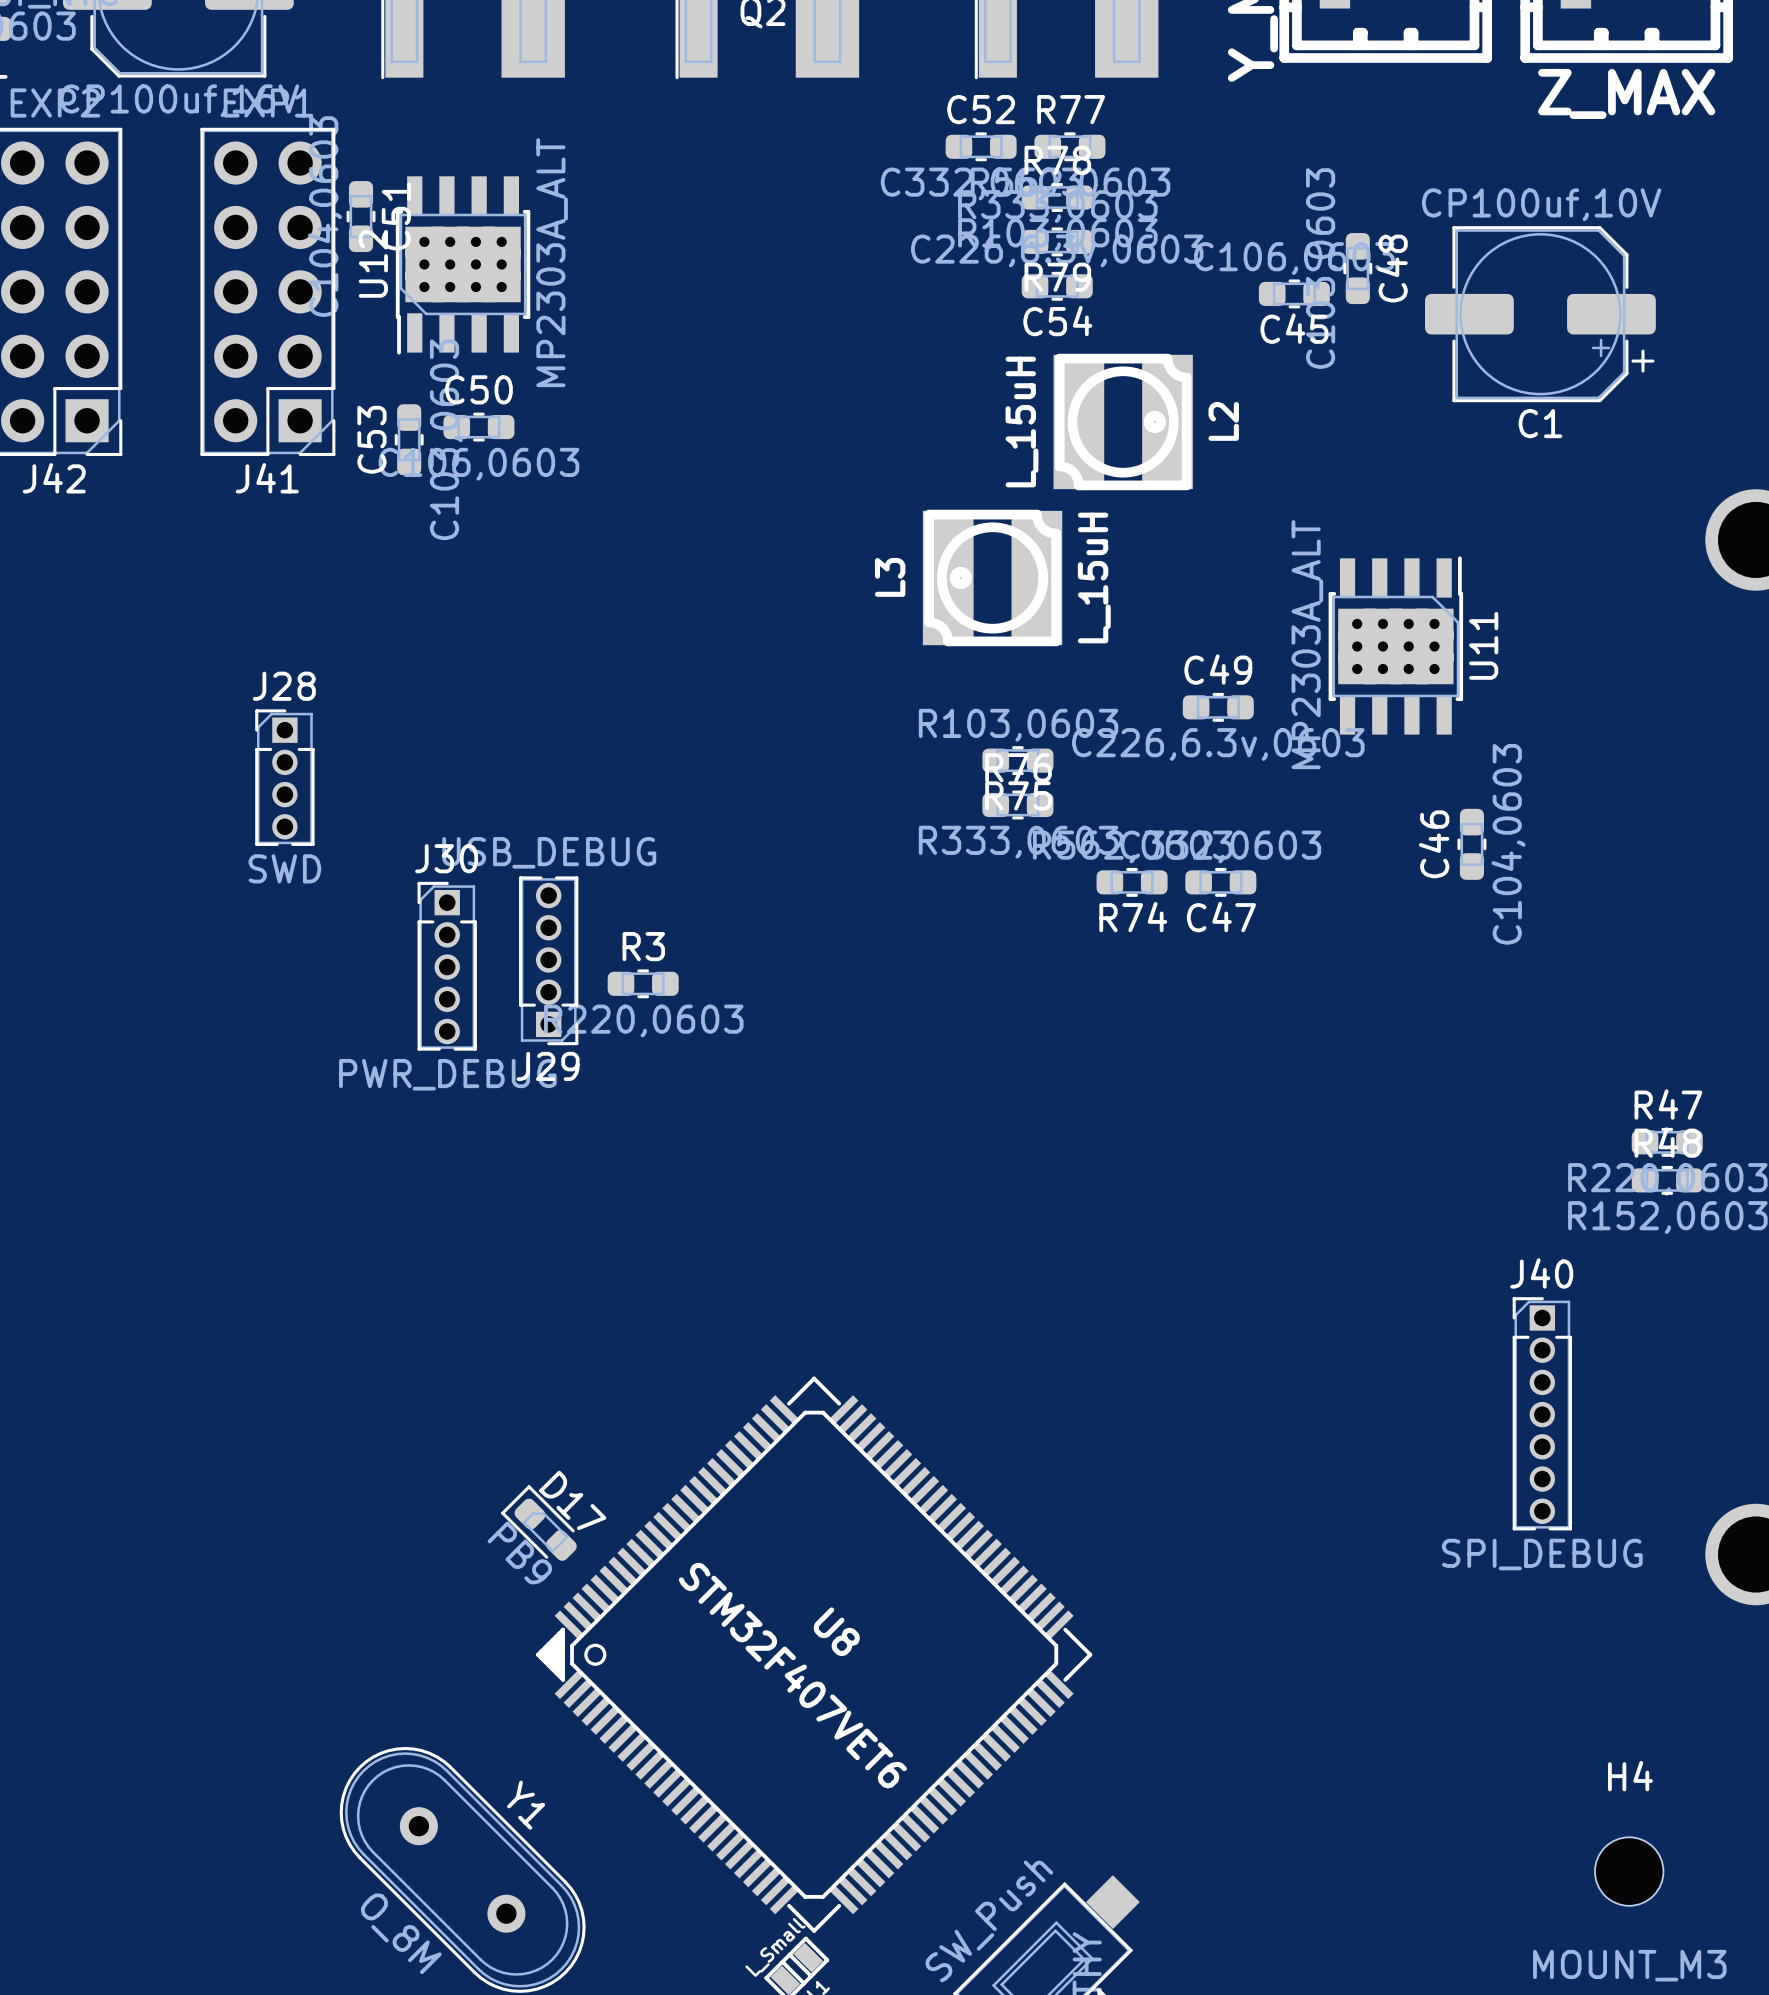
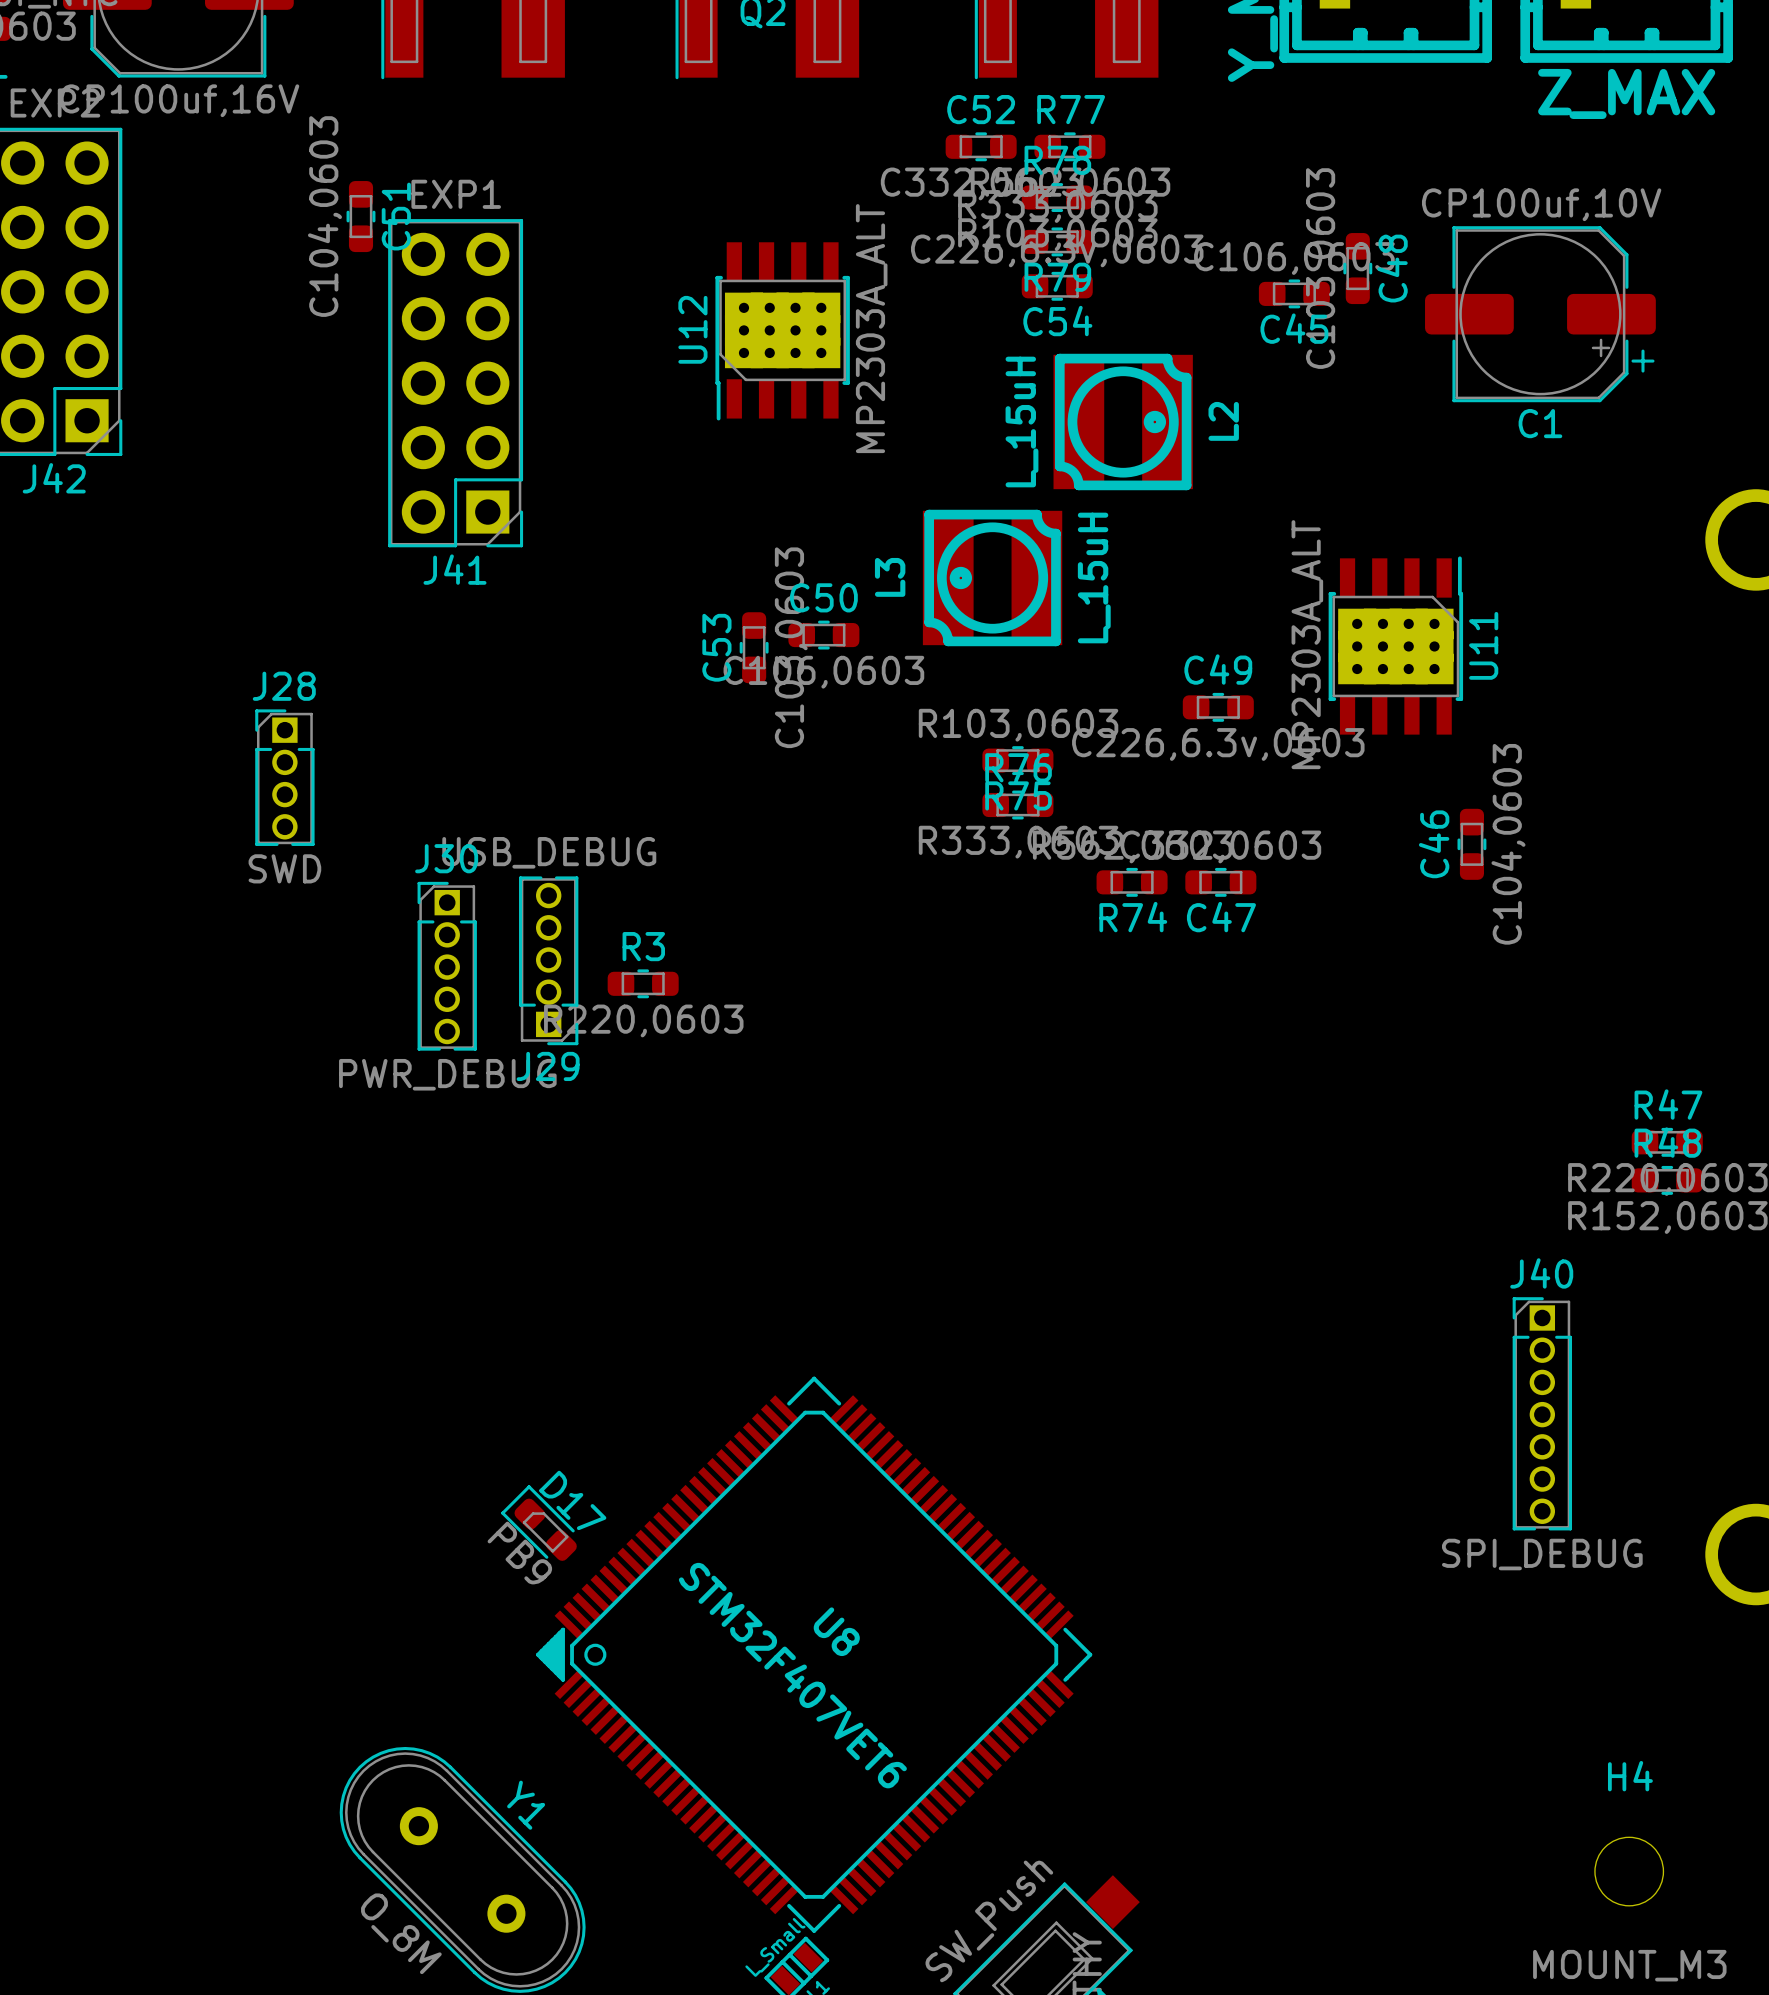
U12 position: (463, 265) -> (782, 331)
J41 position: (267, 291) -> (455, 383)
C50 position: (478, 427) -> (823, 635)
C53 position: (409, 439) -> (754, 647)

